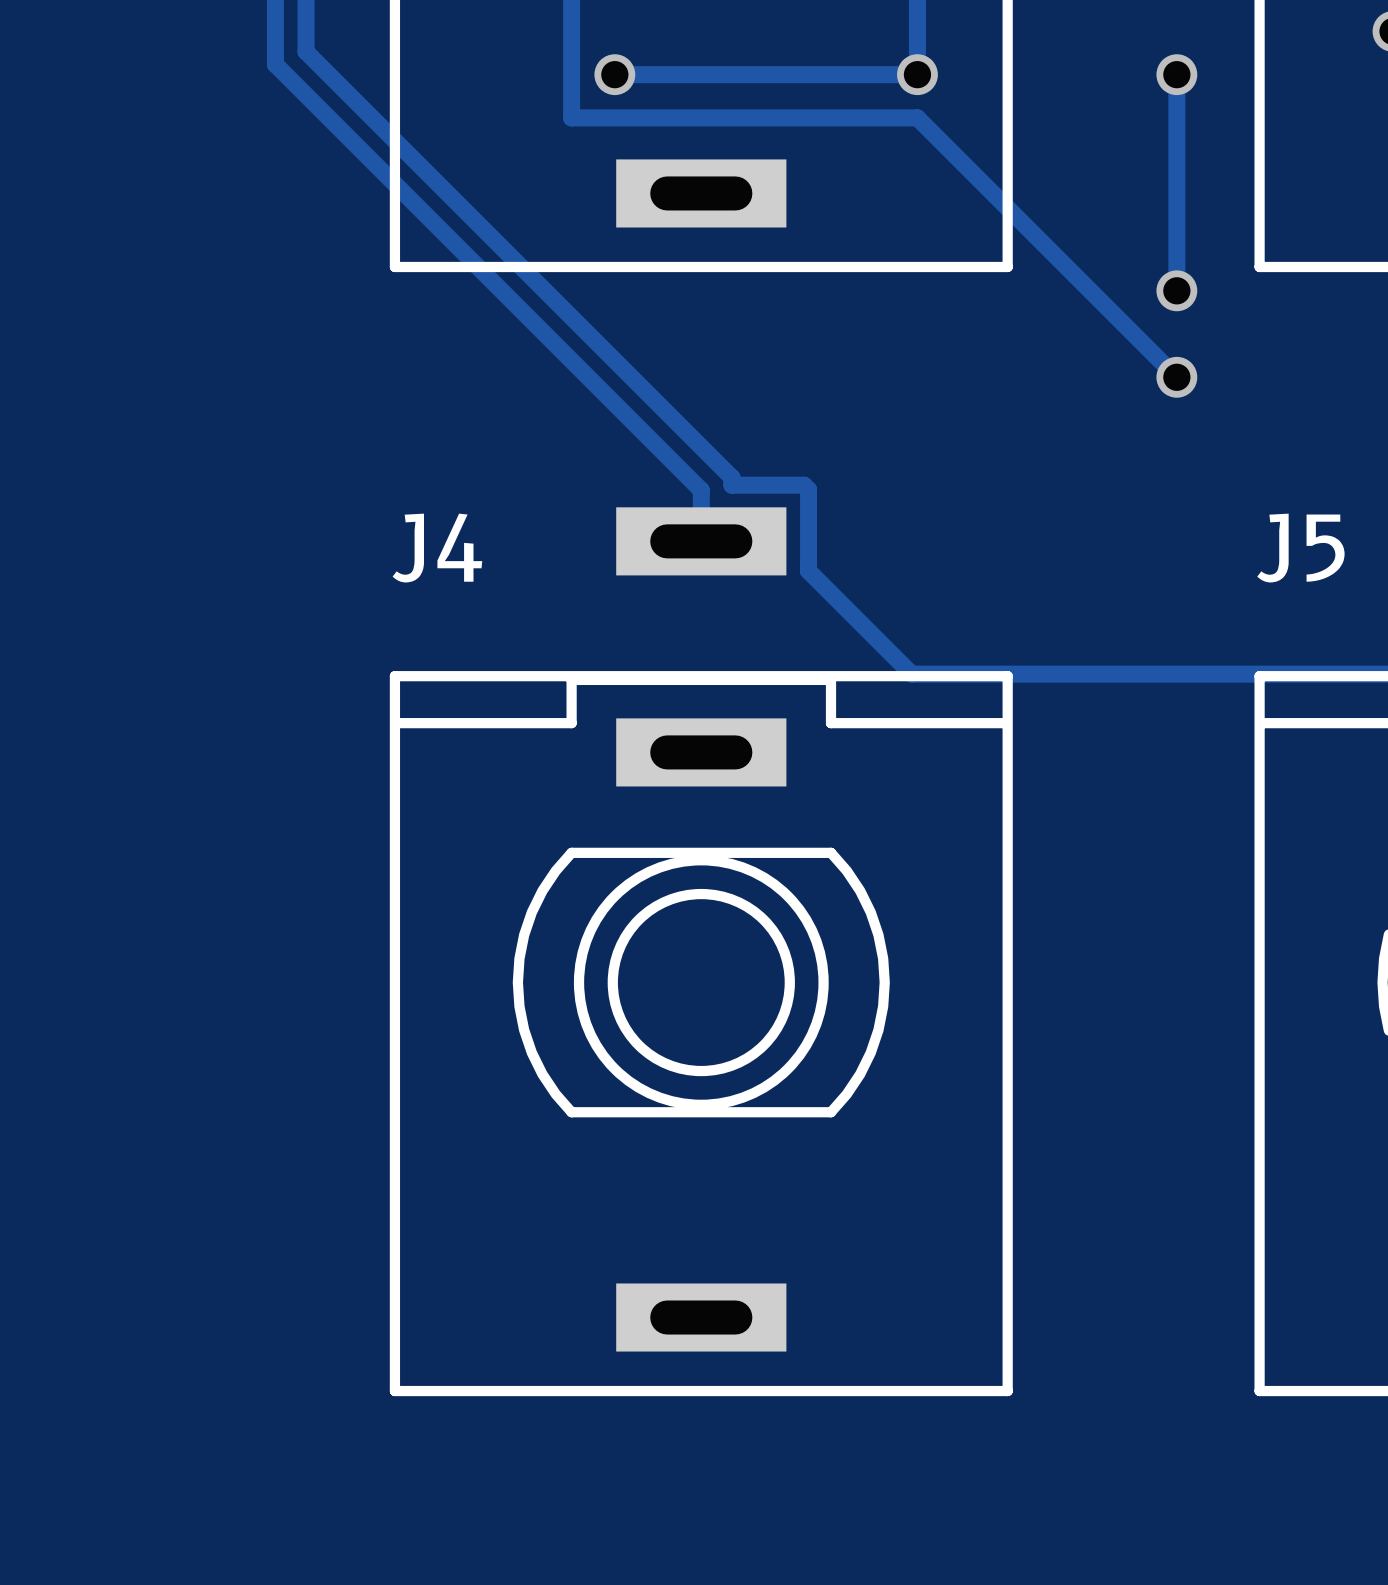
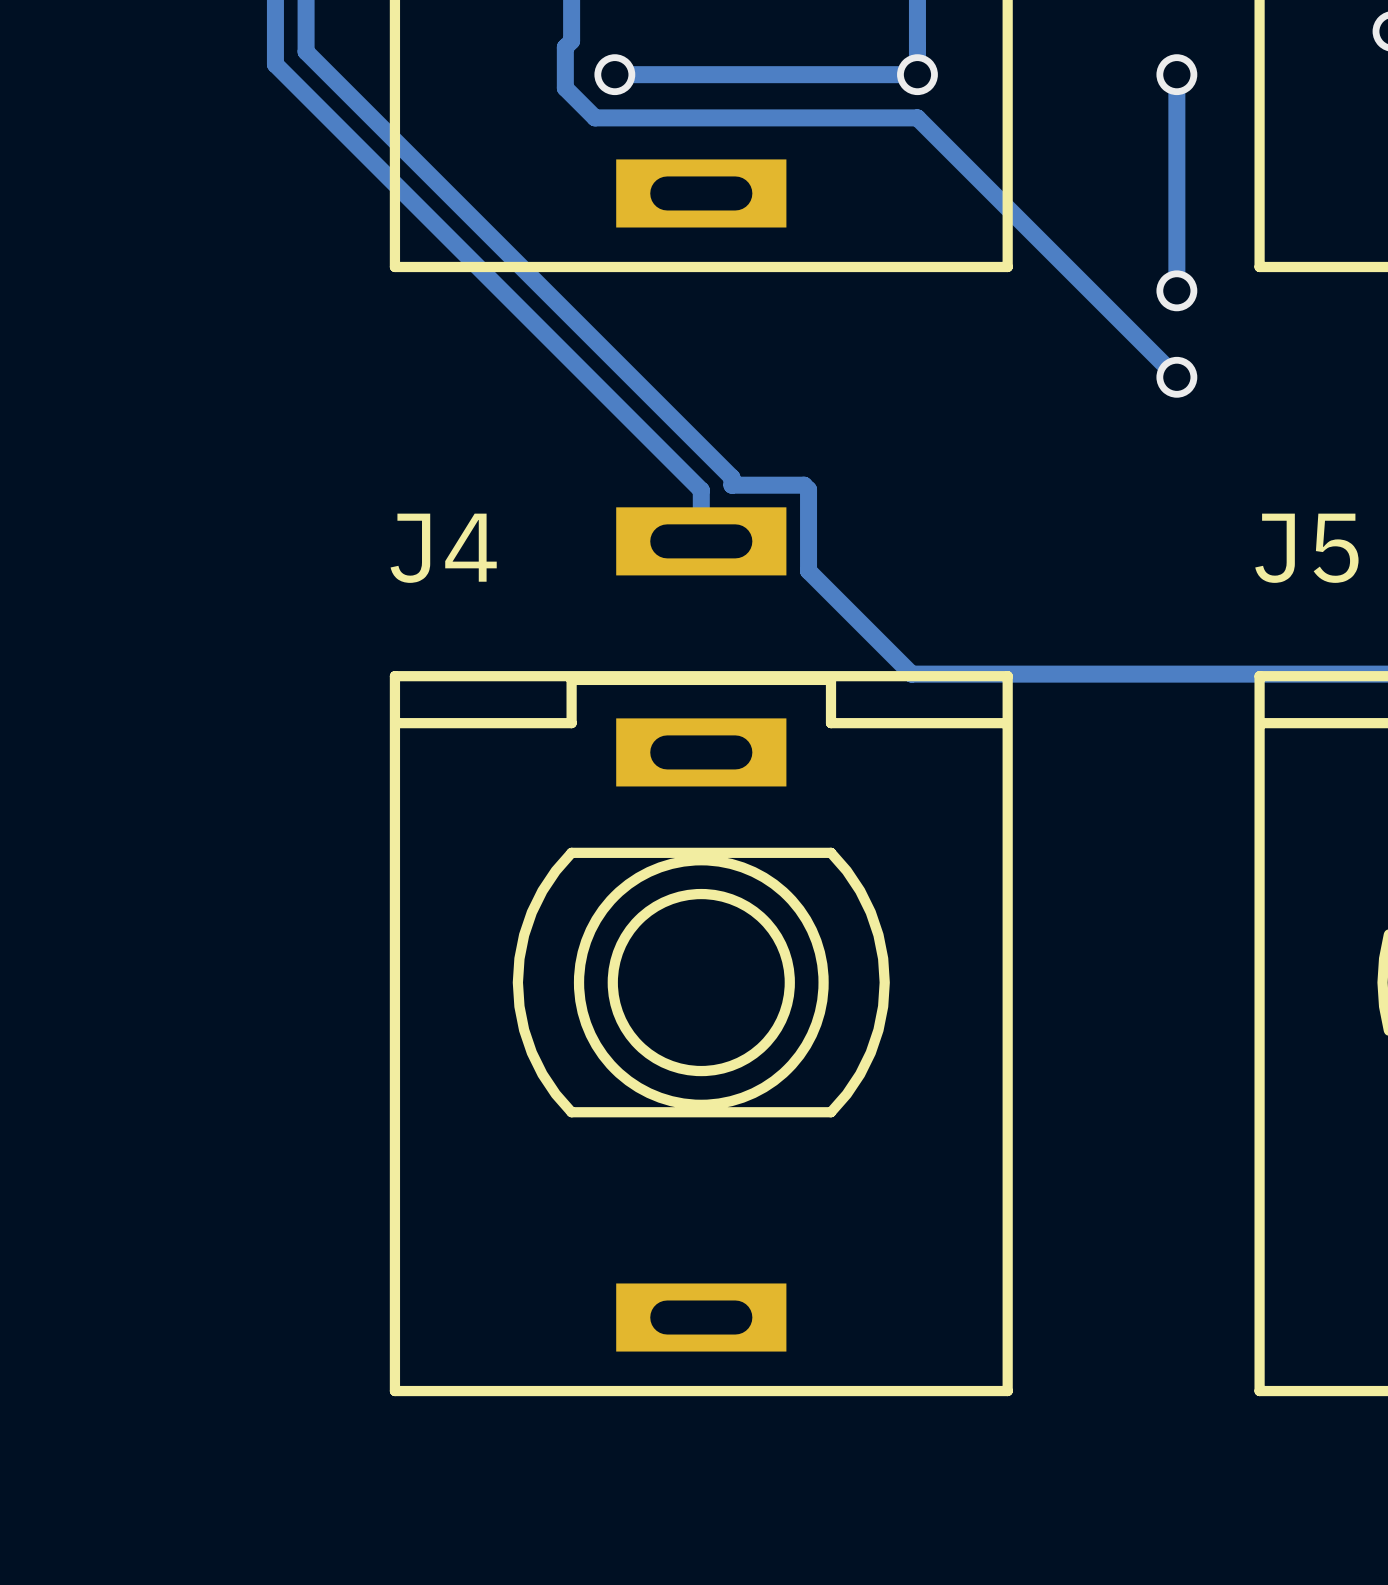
track: (571, 41) (571, 117) (595, 117) -> (571, 41) (565, 47) (565, 88) (595, 117)

